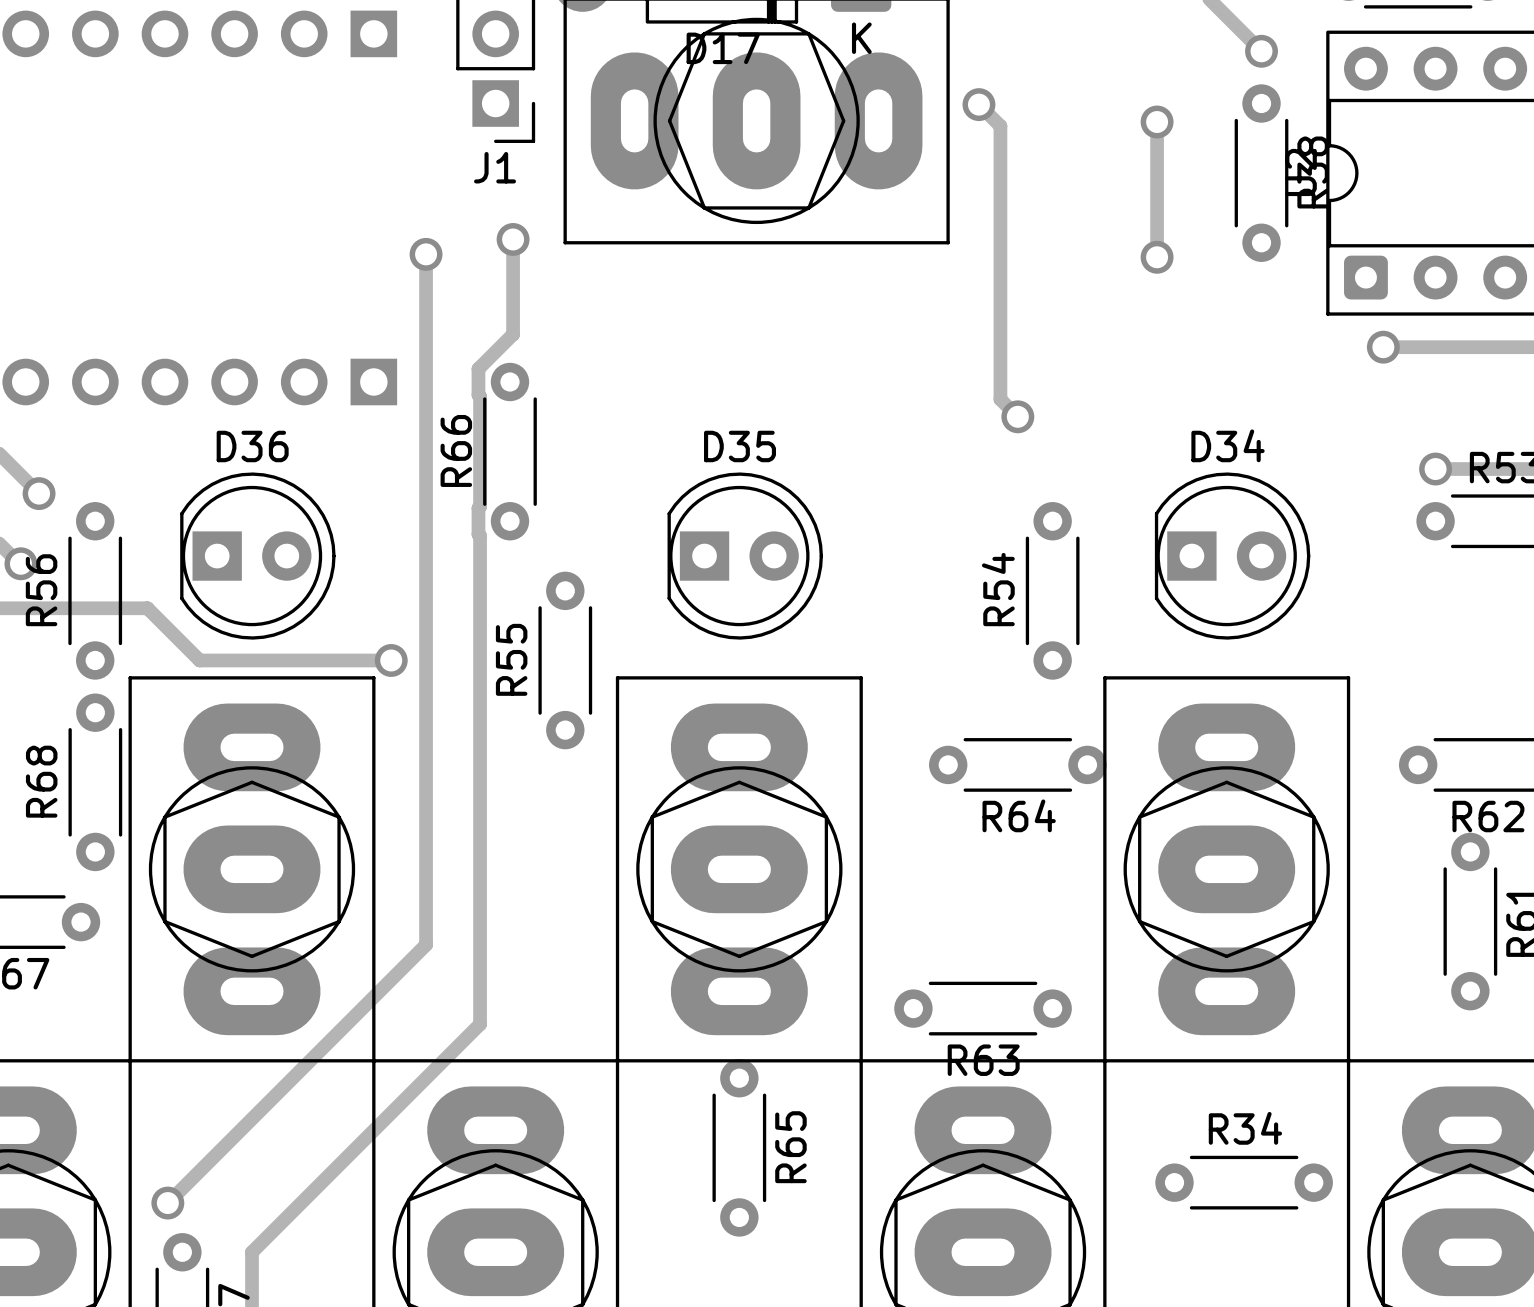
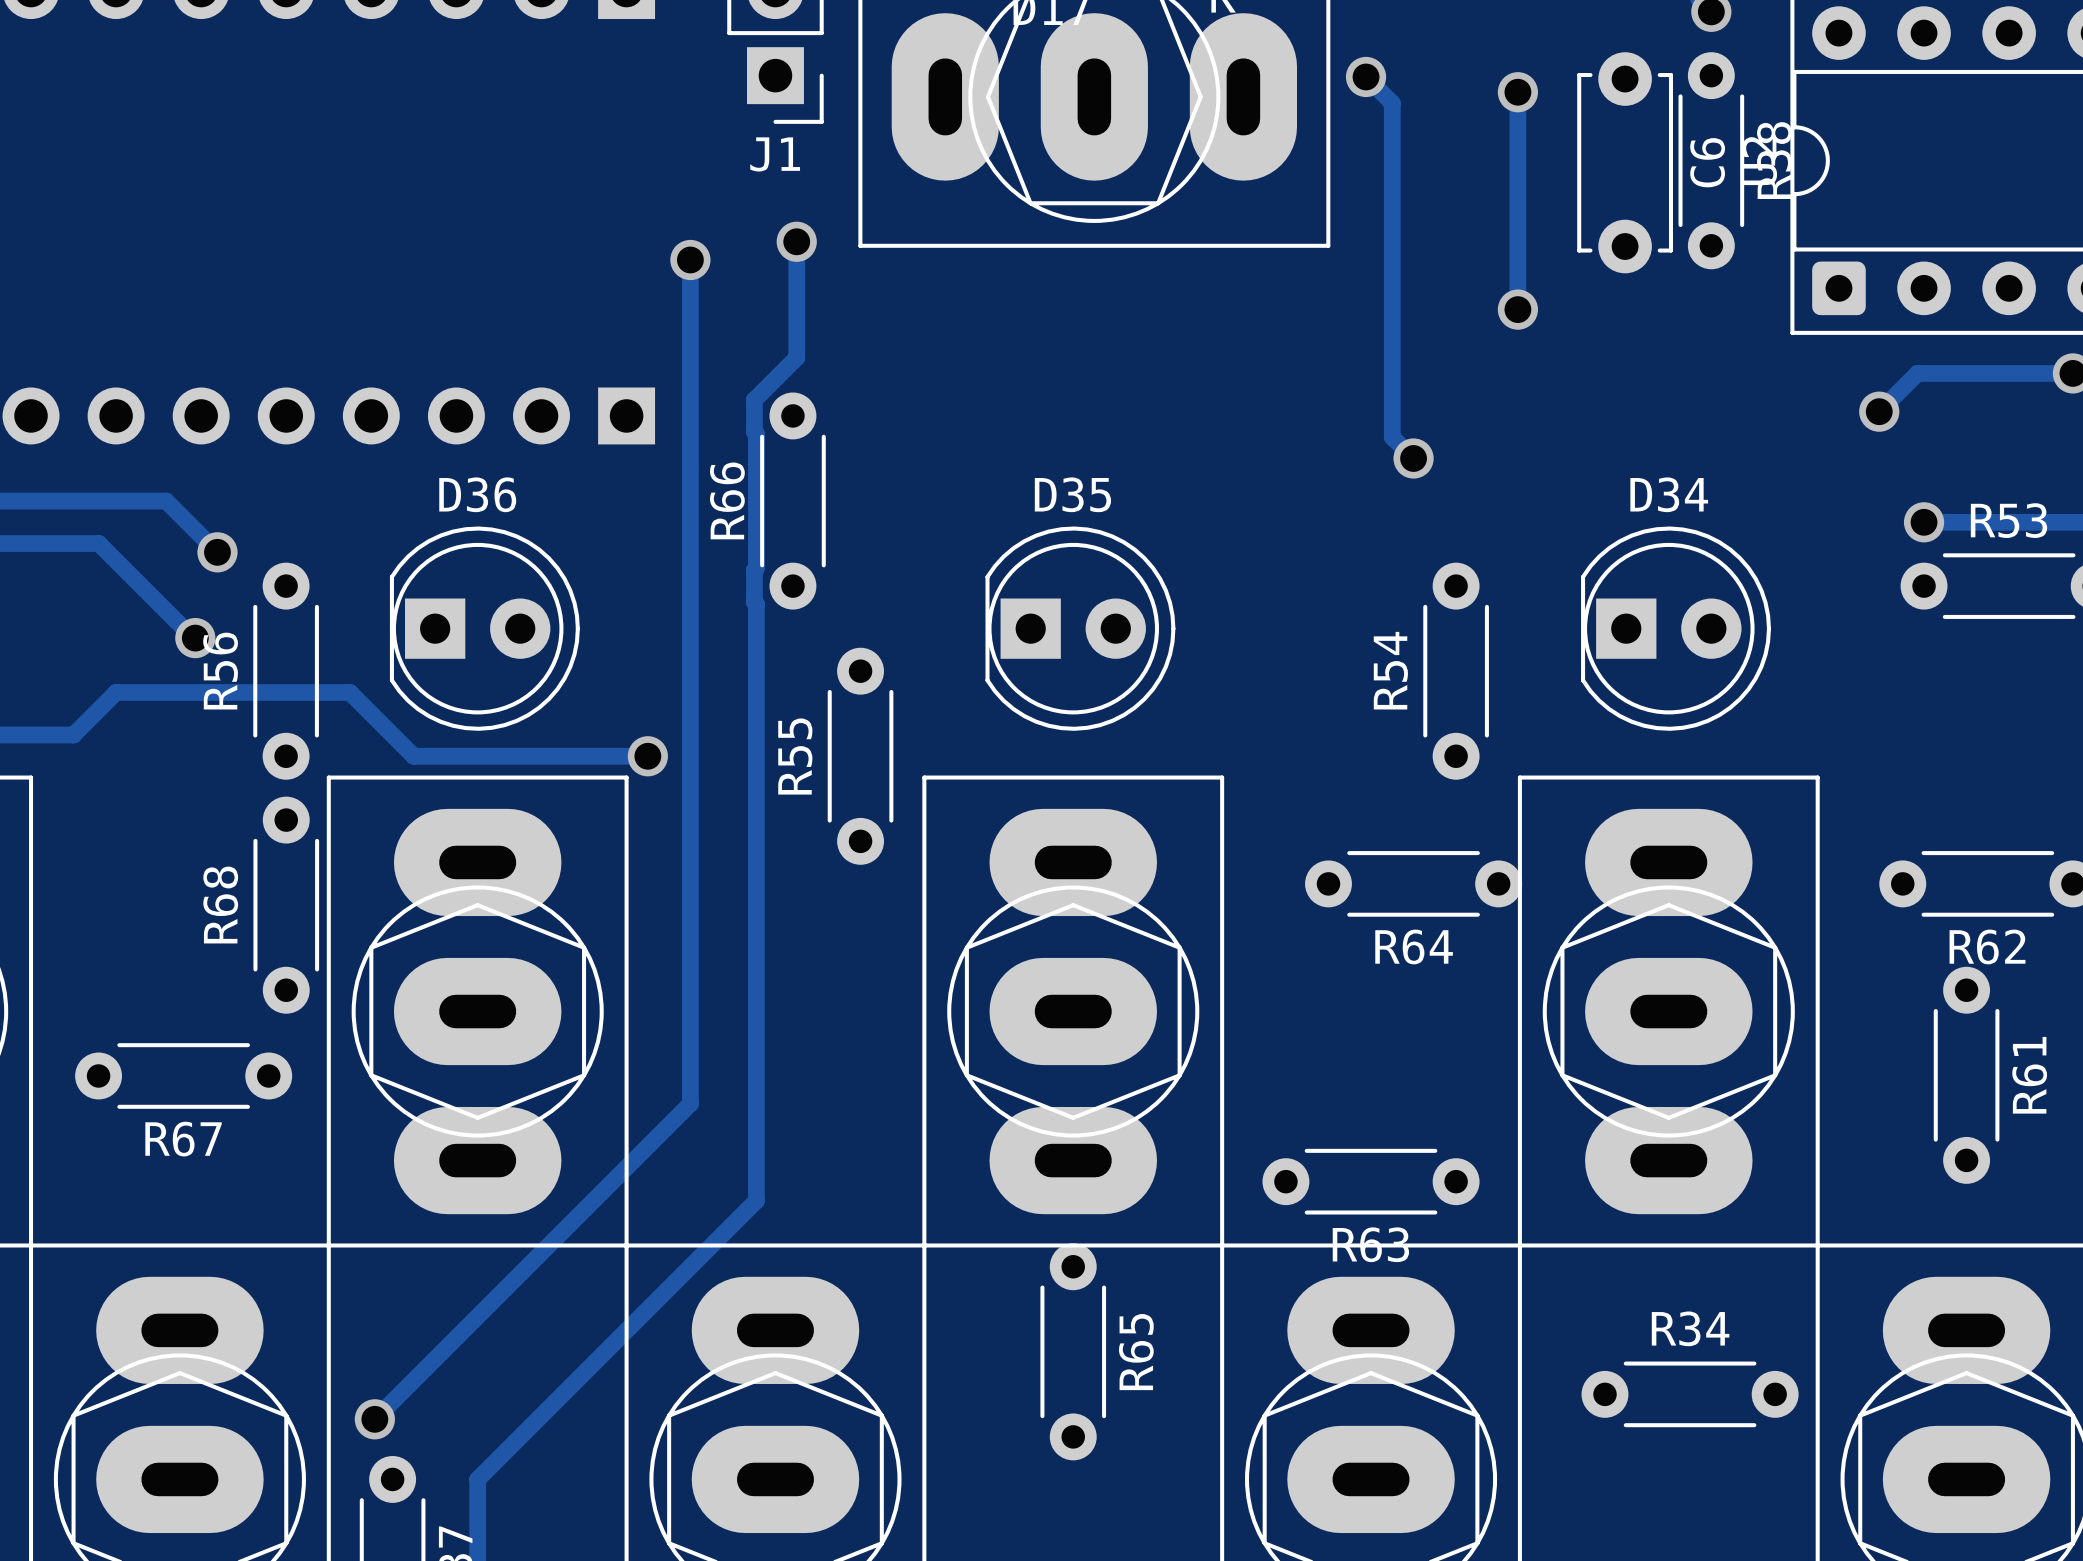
track: none -> (1517, 92) (1517, 309)
track: (1157, 122) (1157, 257) -> none
via position: (1157, 122) -> (1517, 92)
C6: none -> (1625, 162)
via position: (1157, 257) -> (1517, 309)
track: (1383, 347) (1430, 347) -> (1879, 411) (1917, 373)
via position: (1383, 347) -> (1879, 411)

